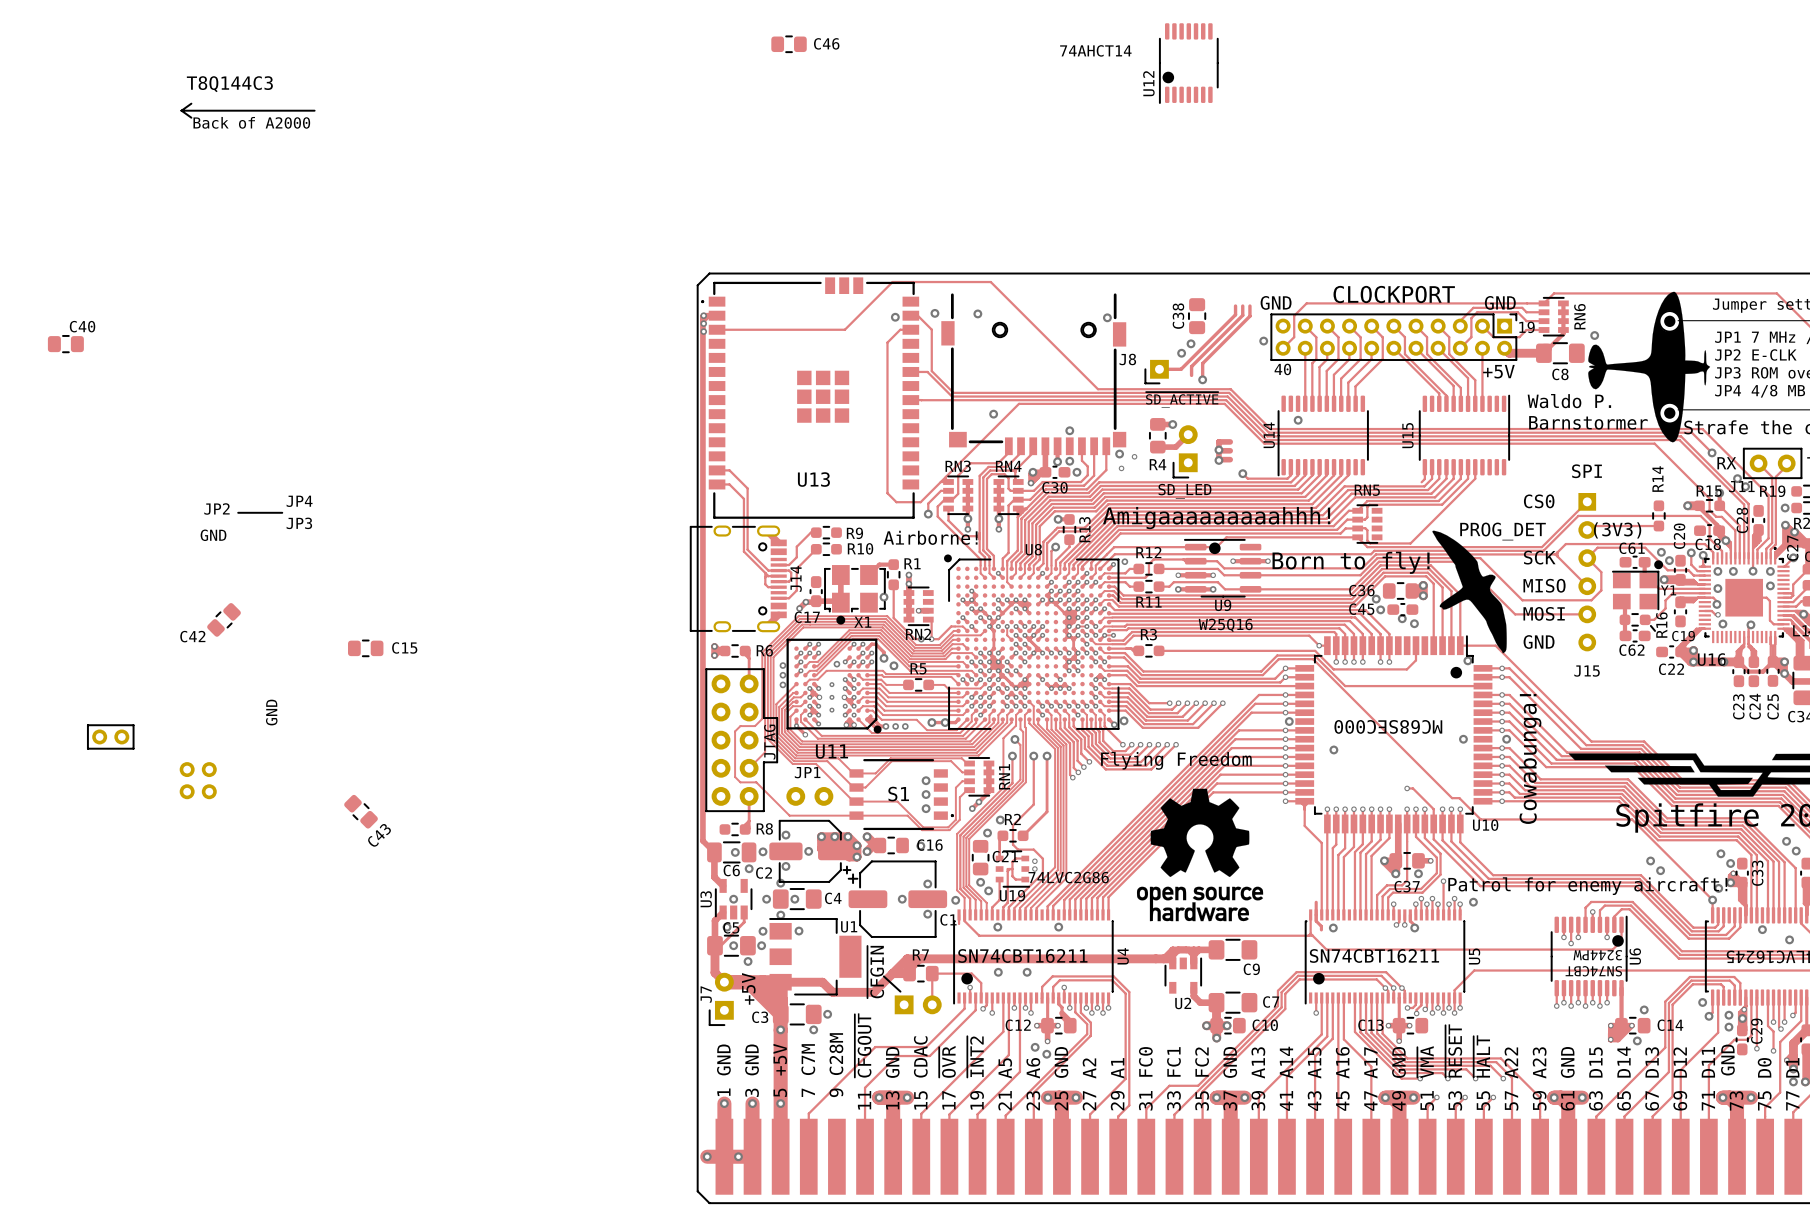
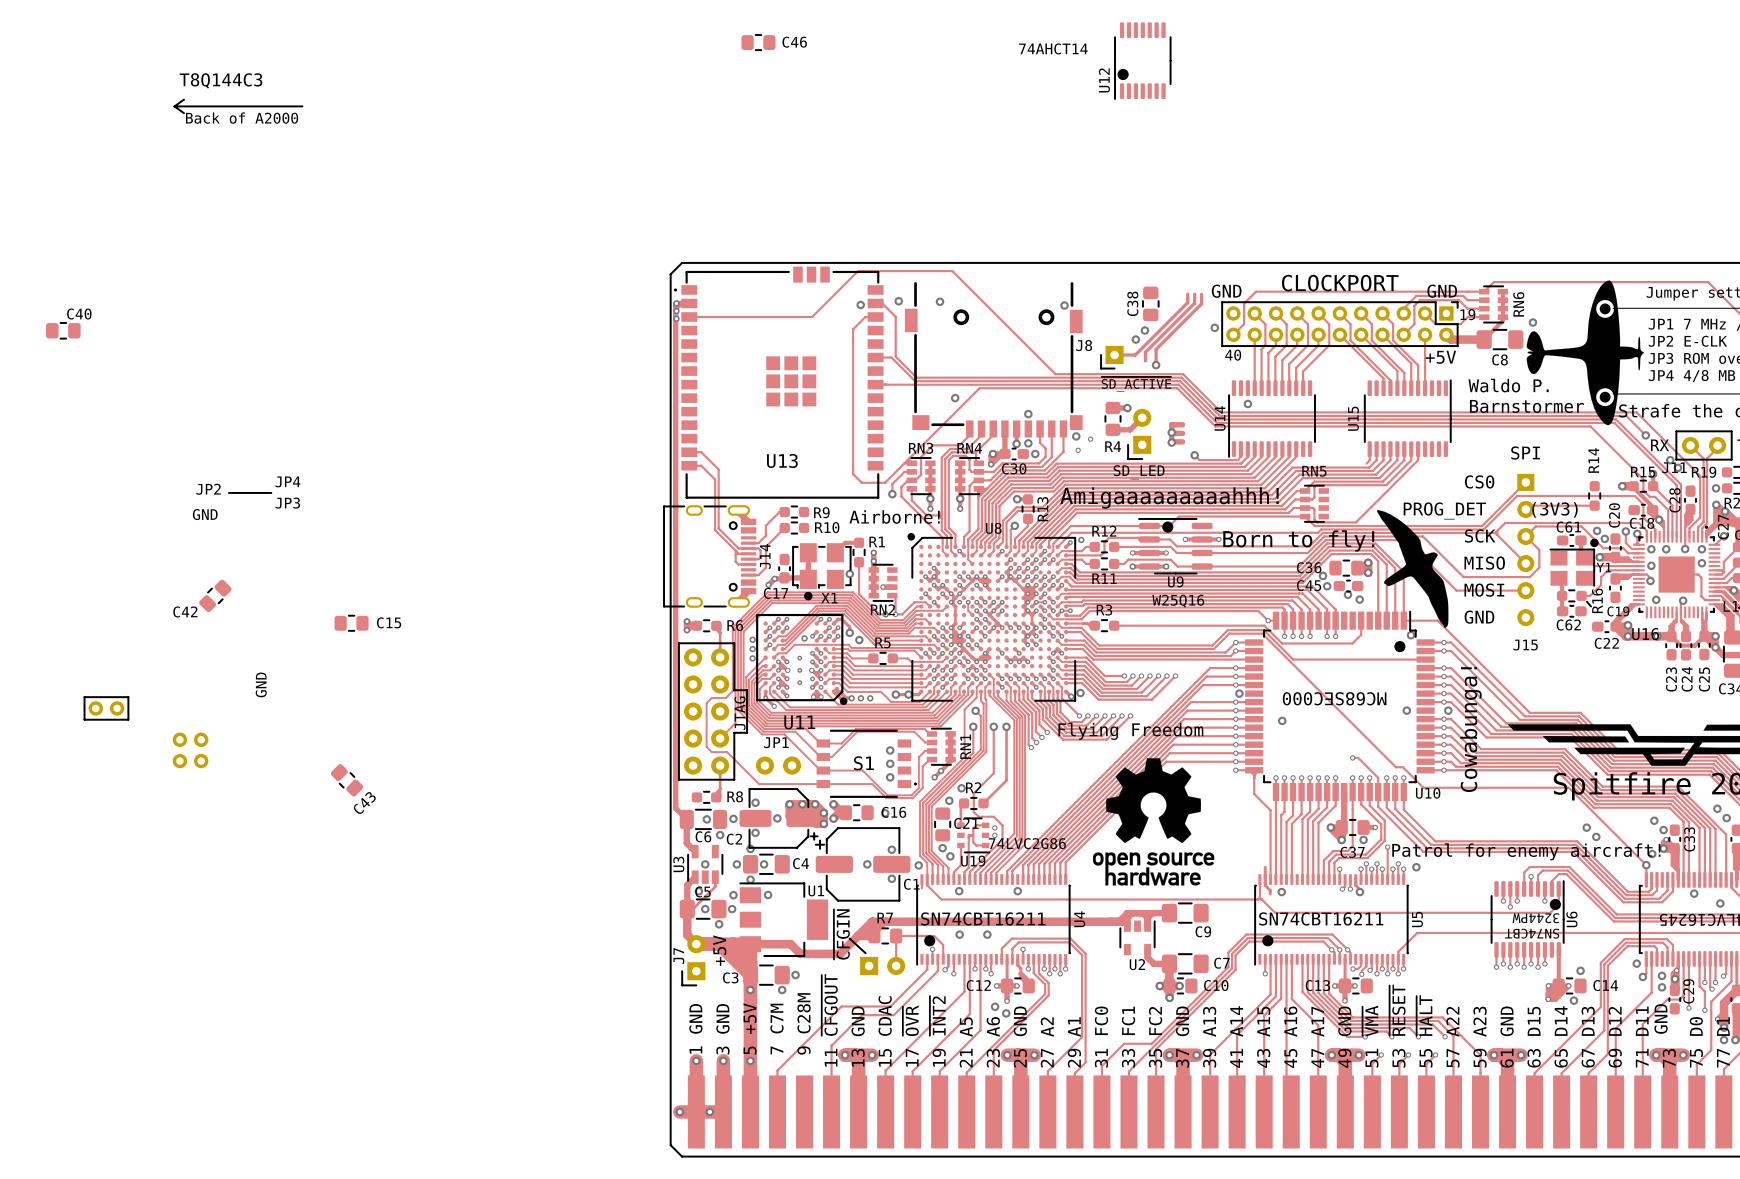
track: (1704, 610) (1711, 610) (1718, 614) -> none
via: (1718, 614) -> none

